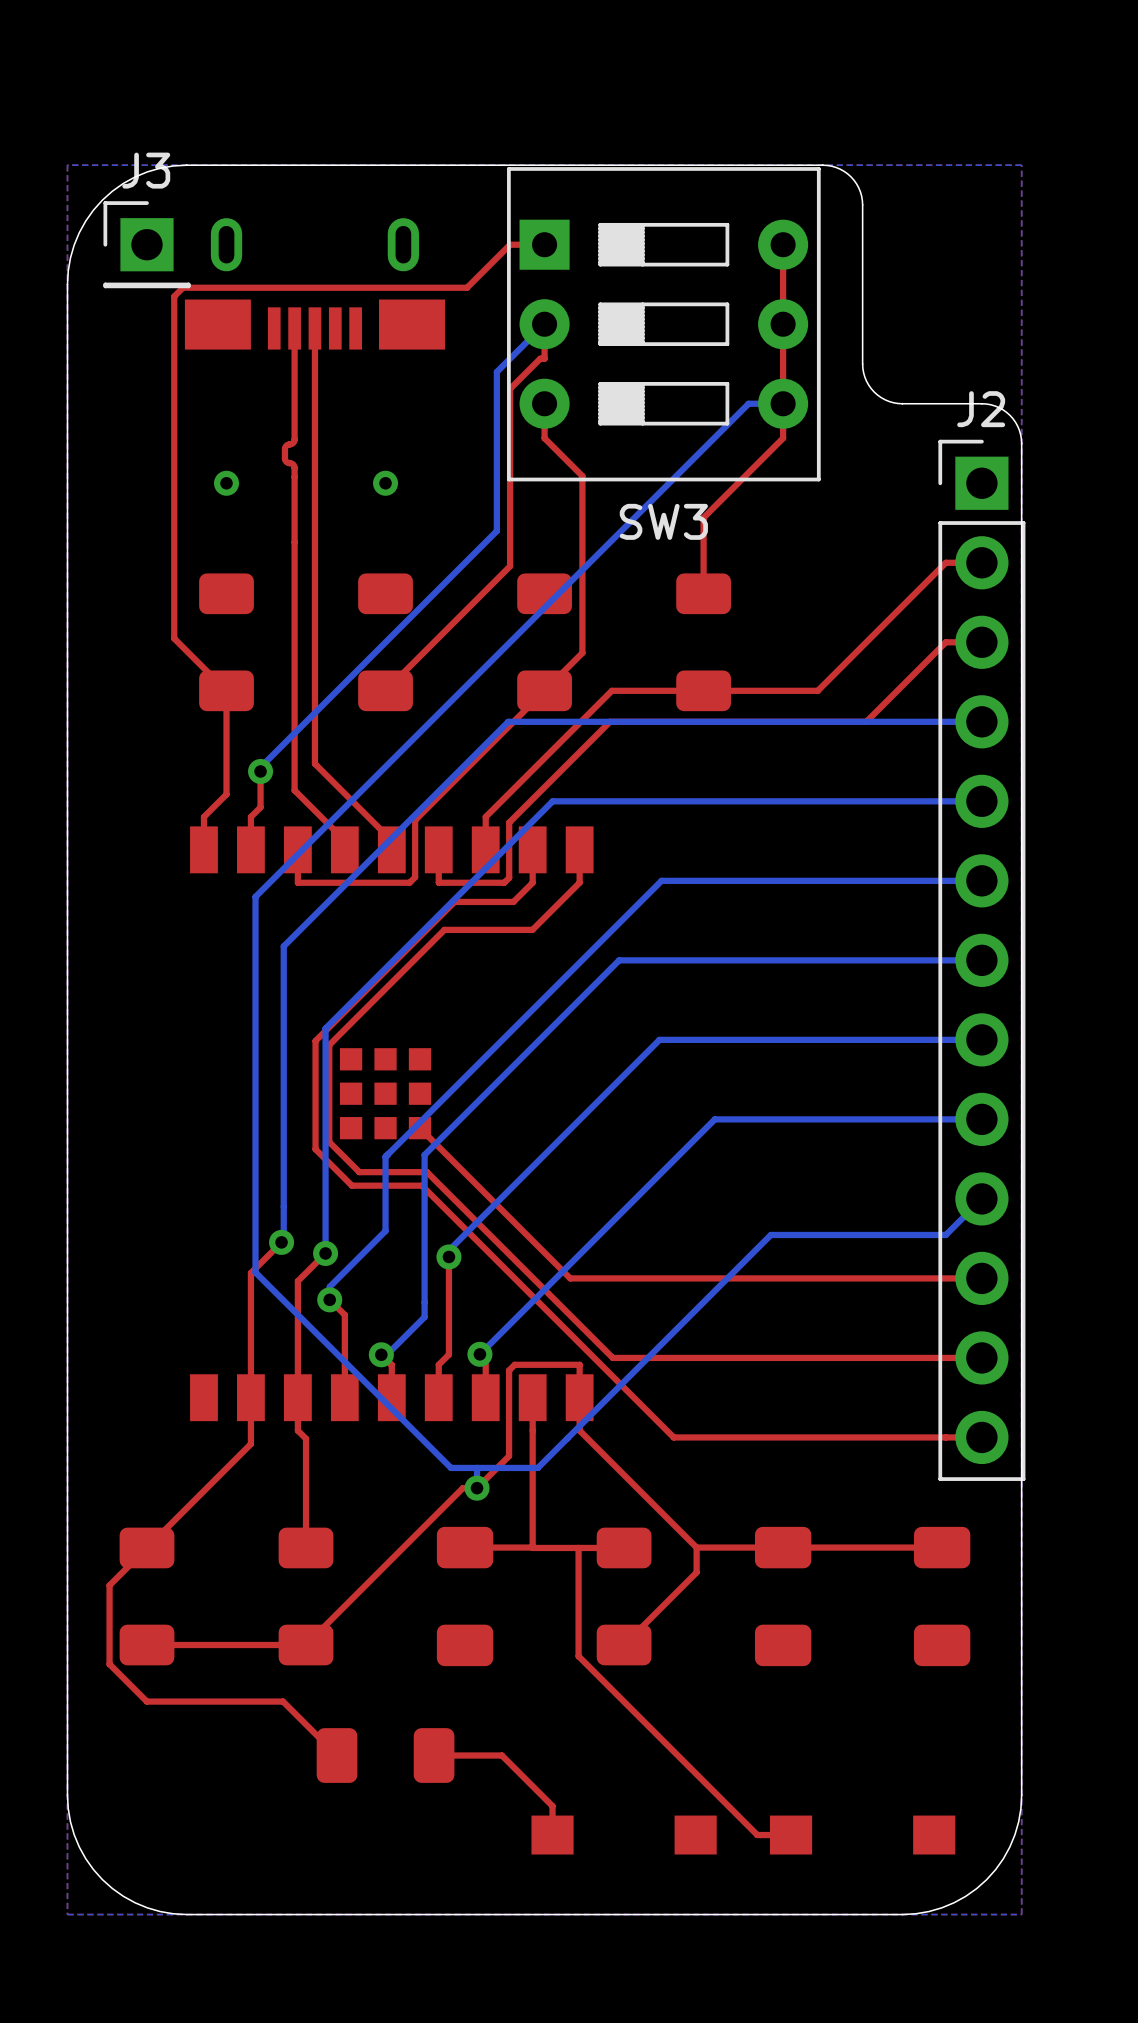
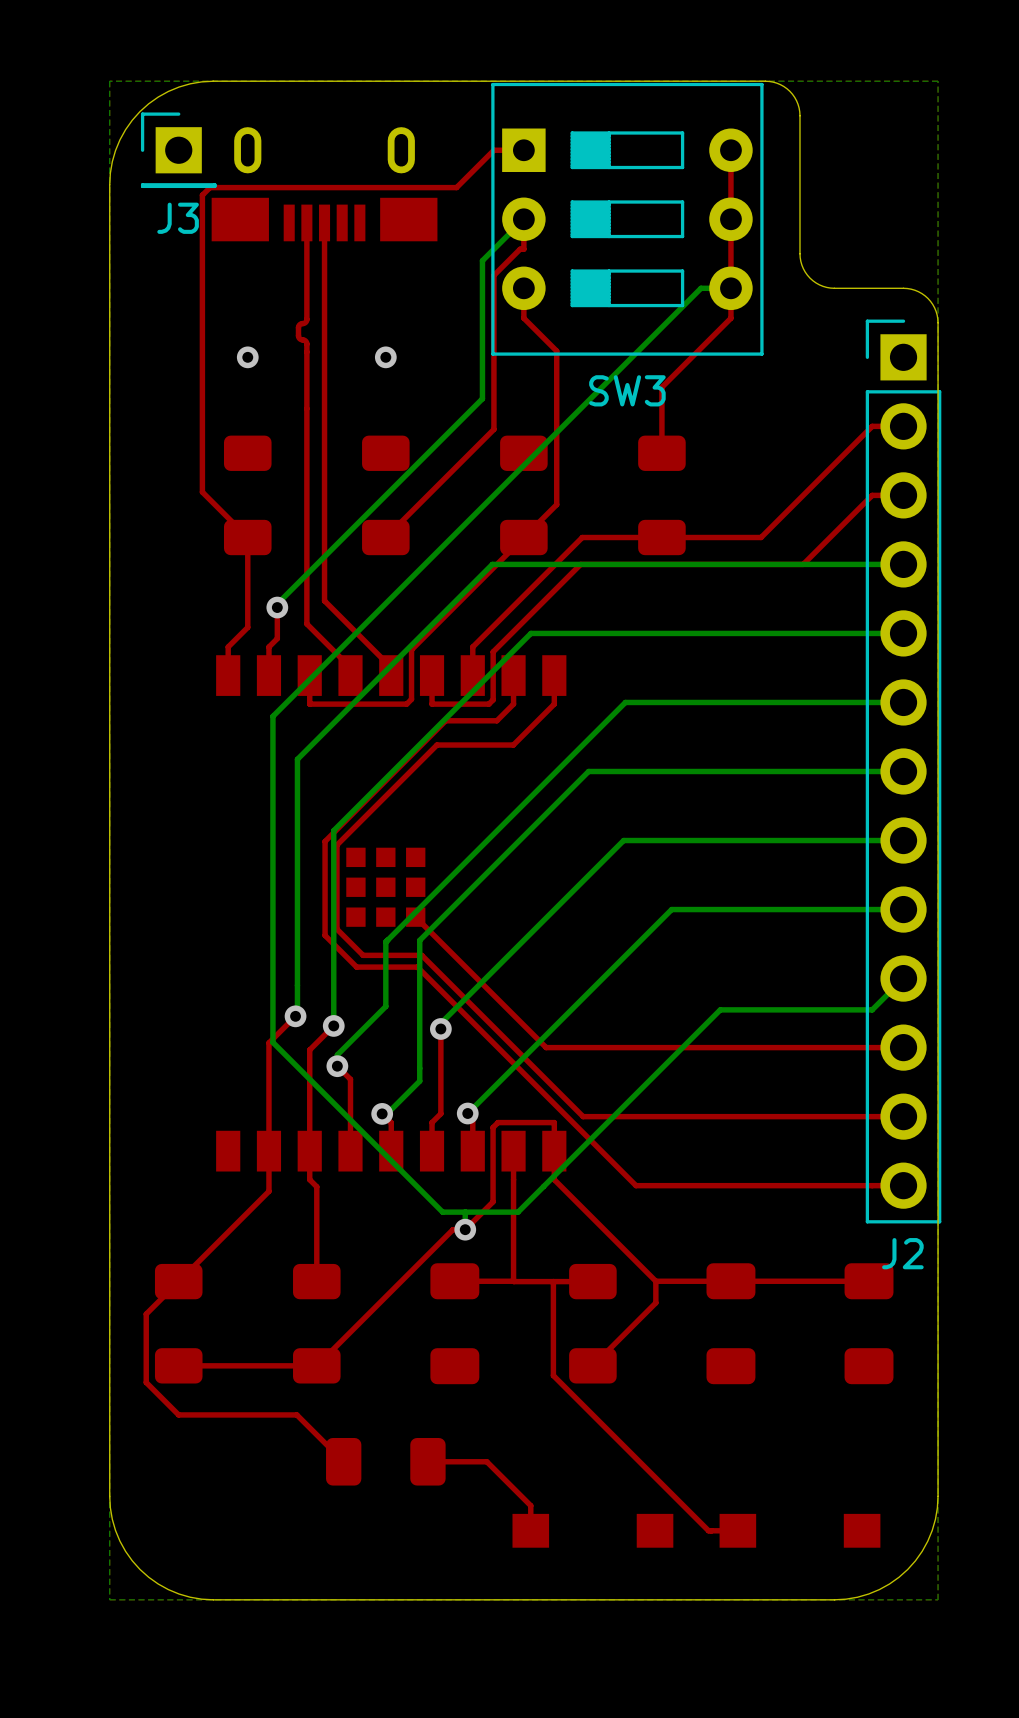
J3 name position: J3 (146, 170) -> J3 (178, 218)
J2 name position: J2 (981, 409) -> J2 (902, 1253)

